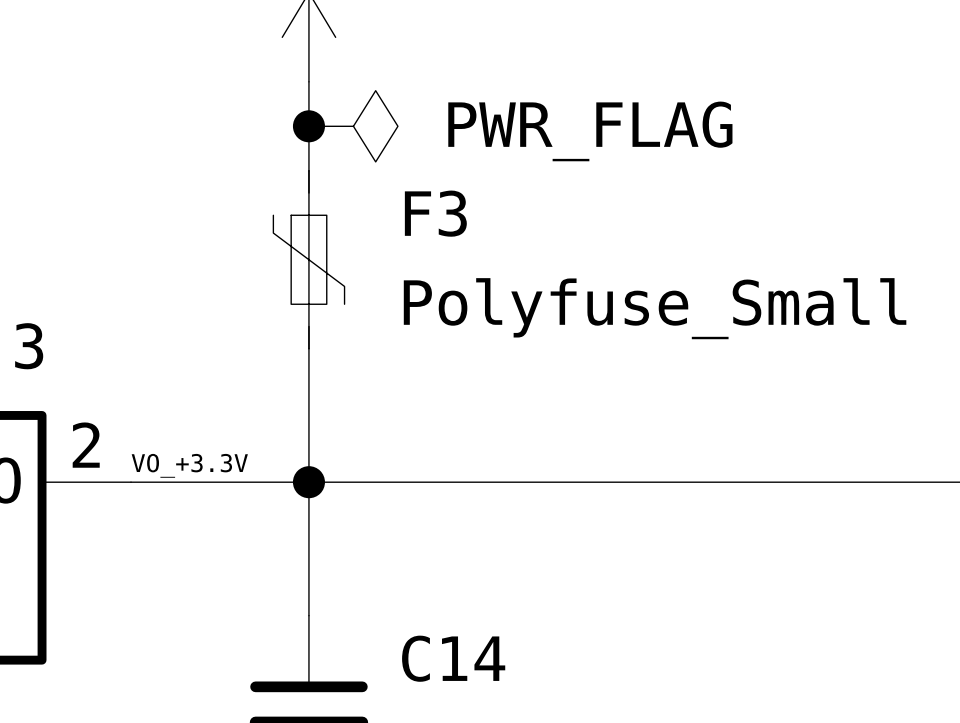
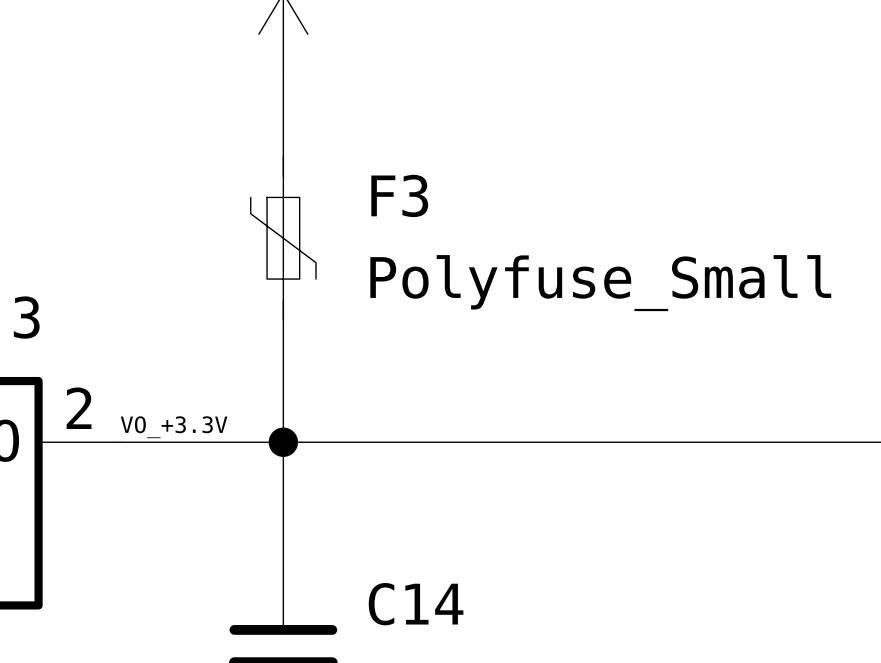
junction: (308, 126) -> none
power symbol: PWR_FLAG (353, 126) -> none

